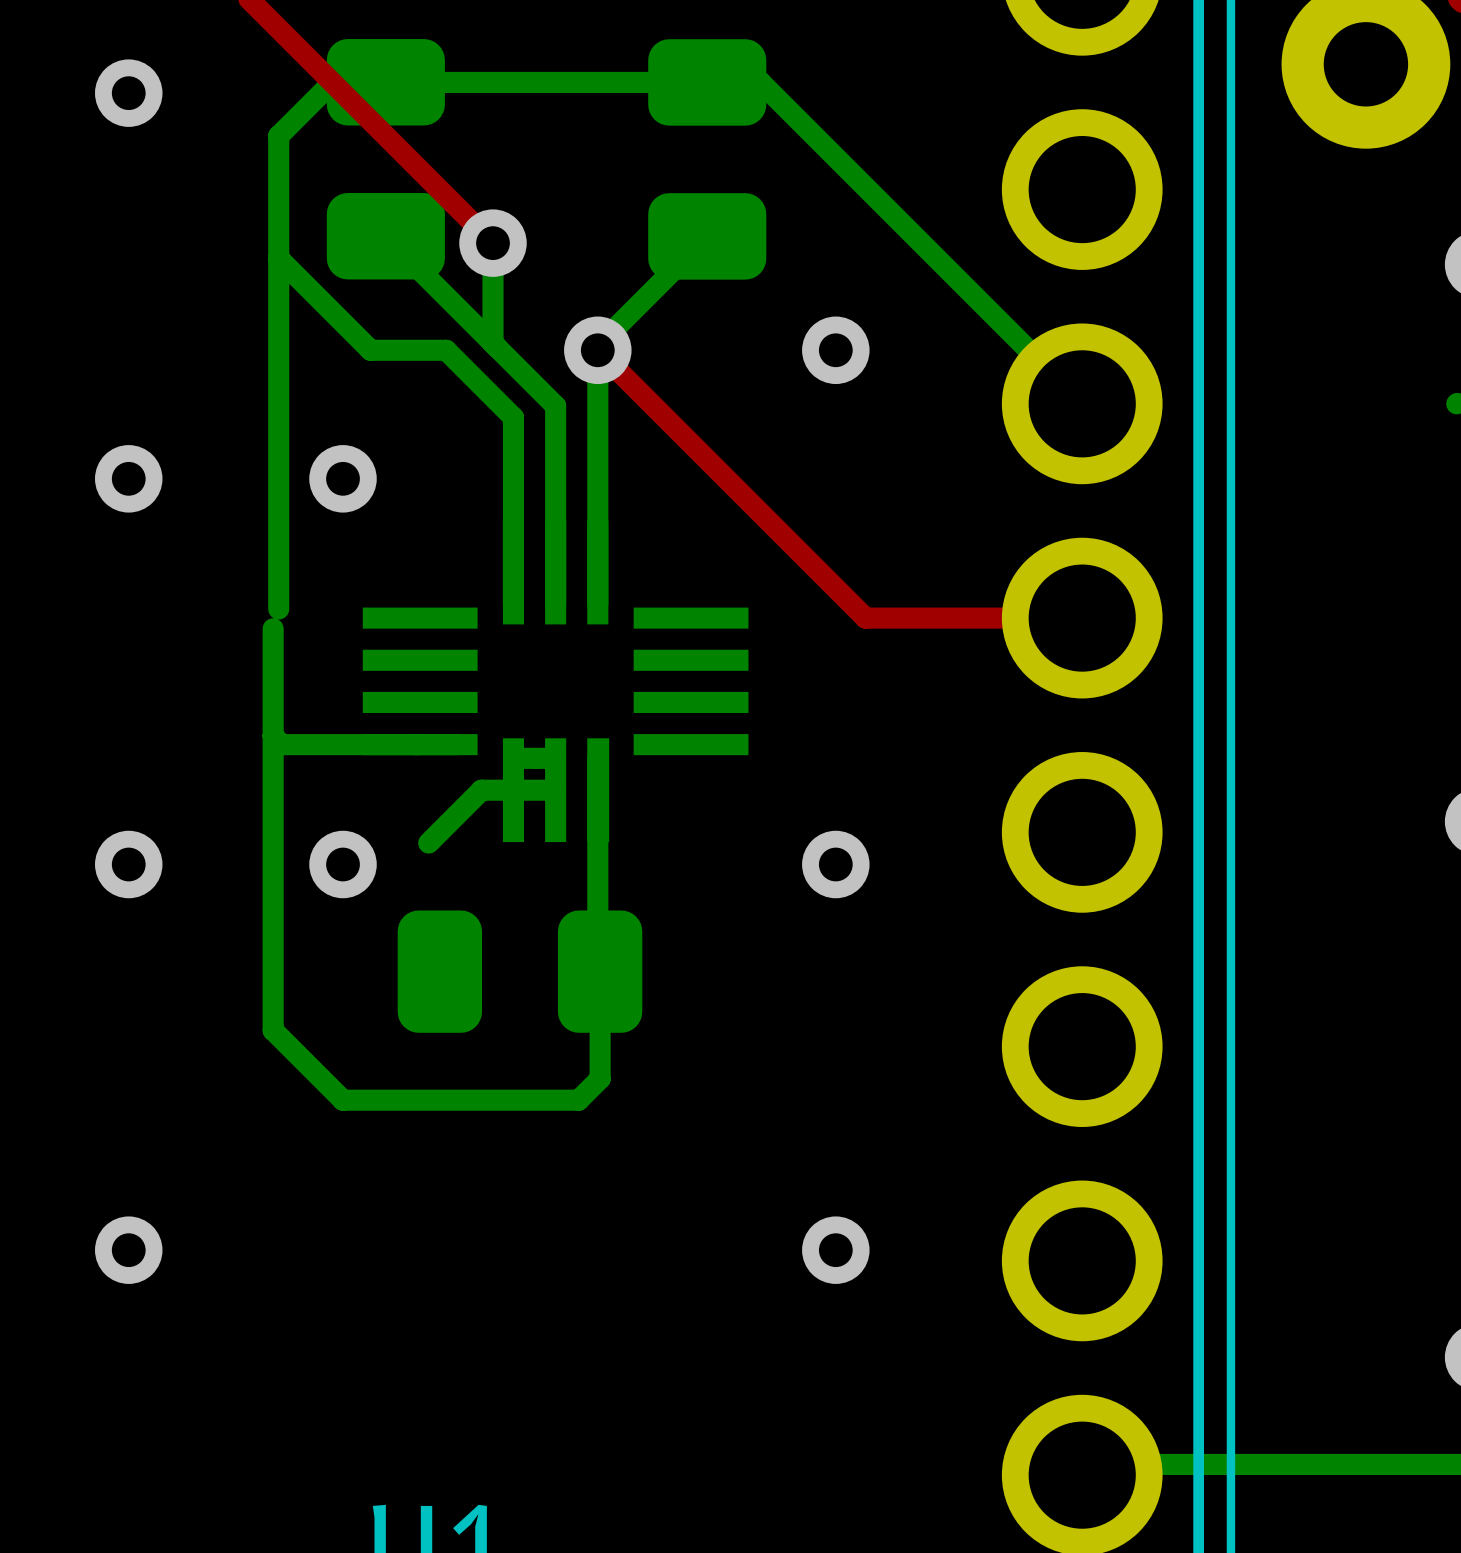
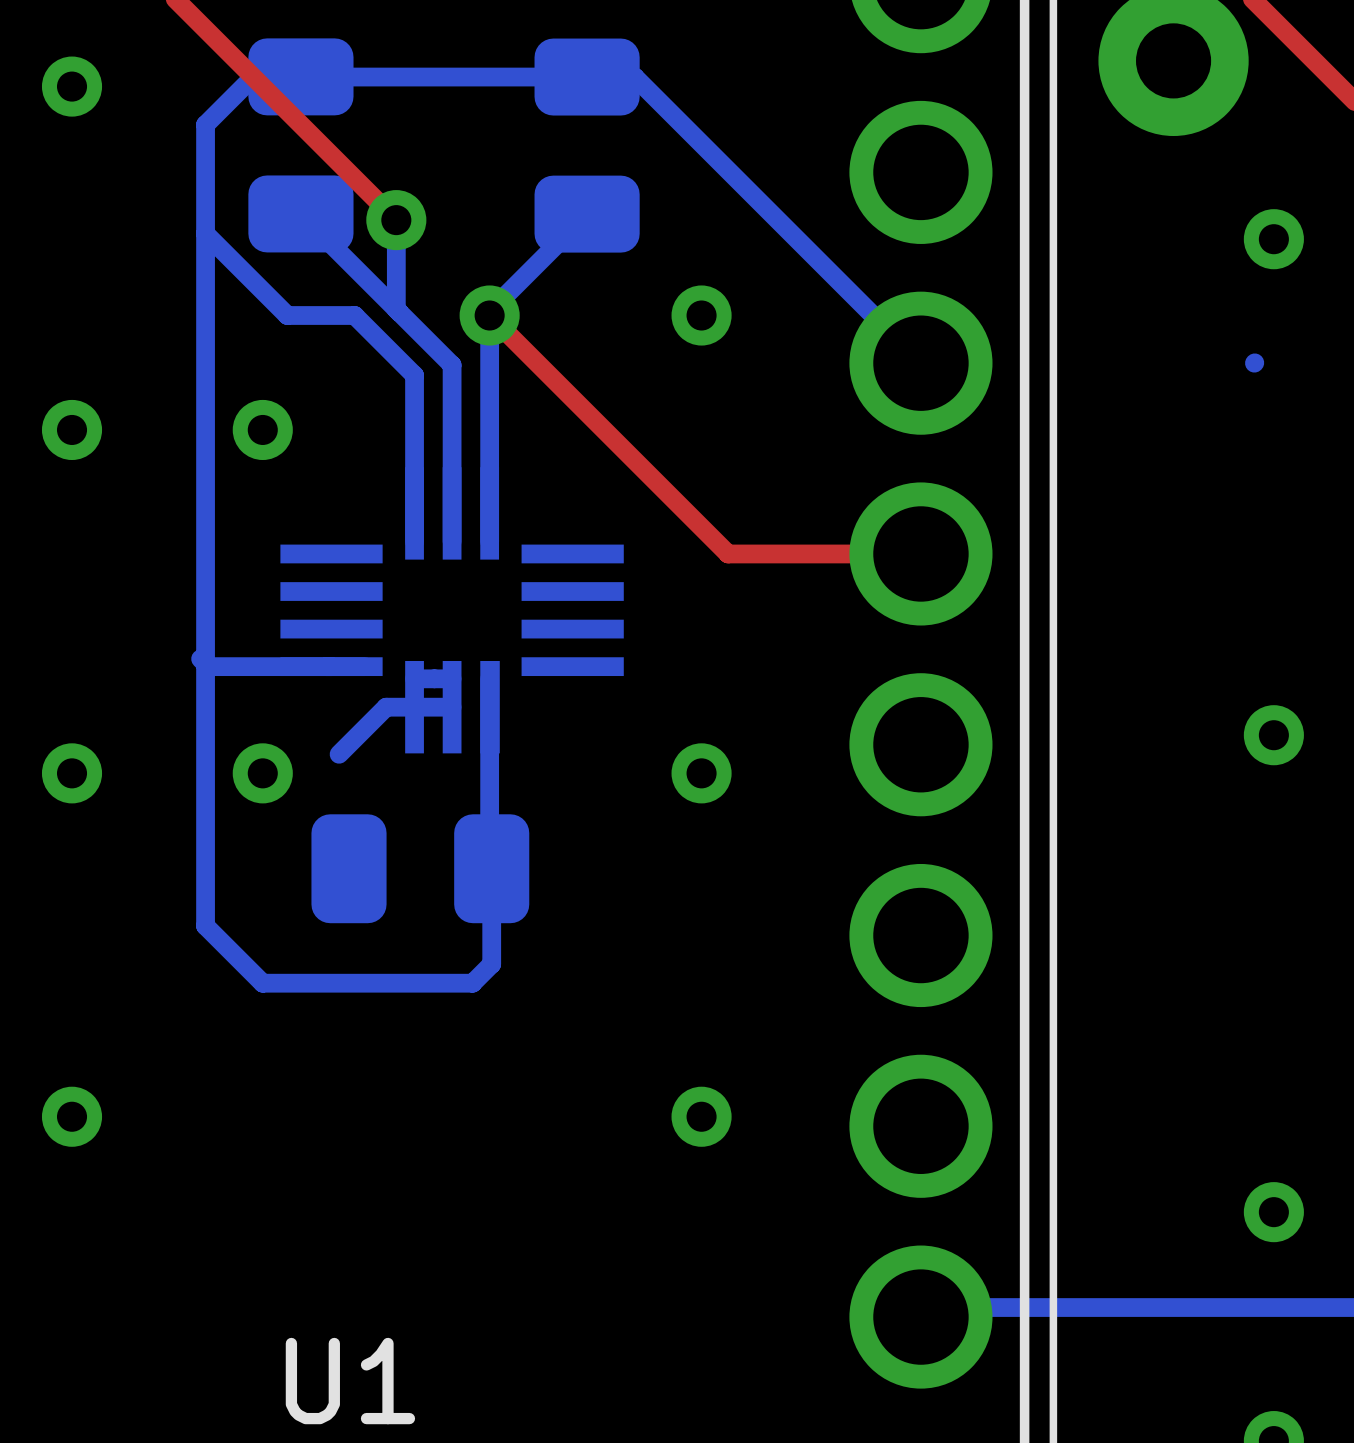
bottom track: (273, 628) (273, 1030) (278, 1035) -> (205, 545) (205, 925)

